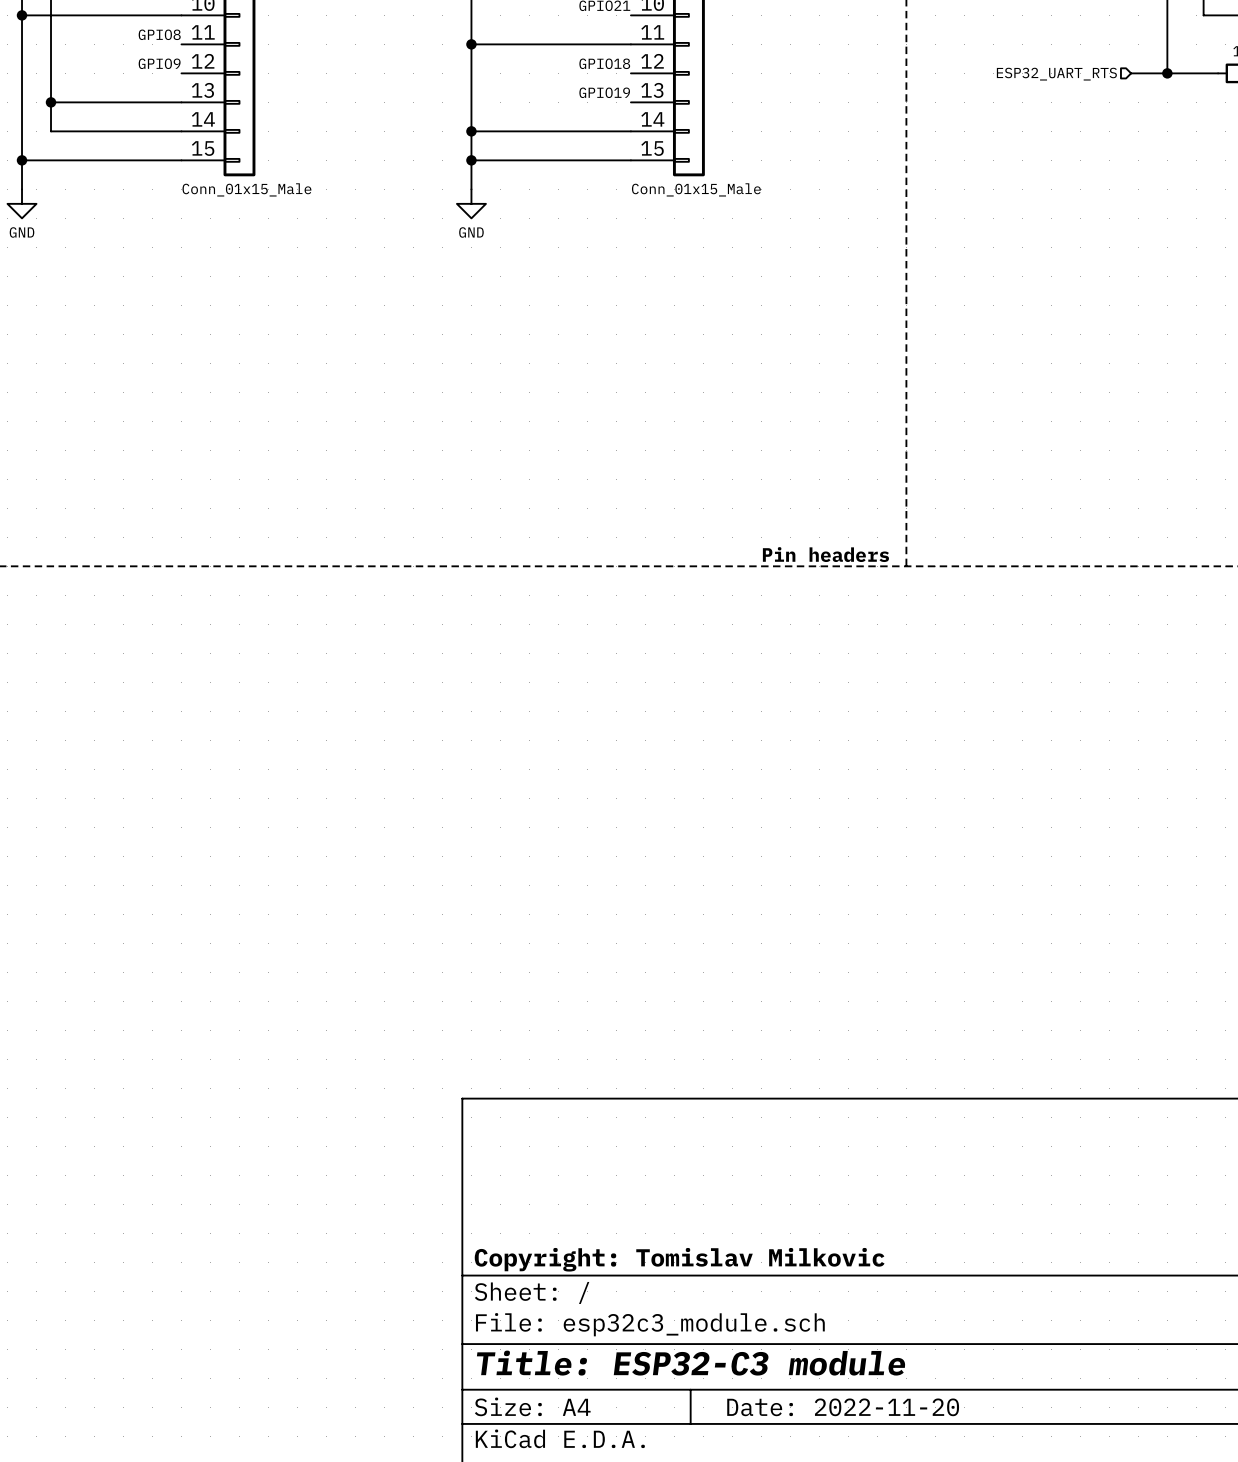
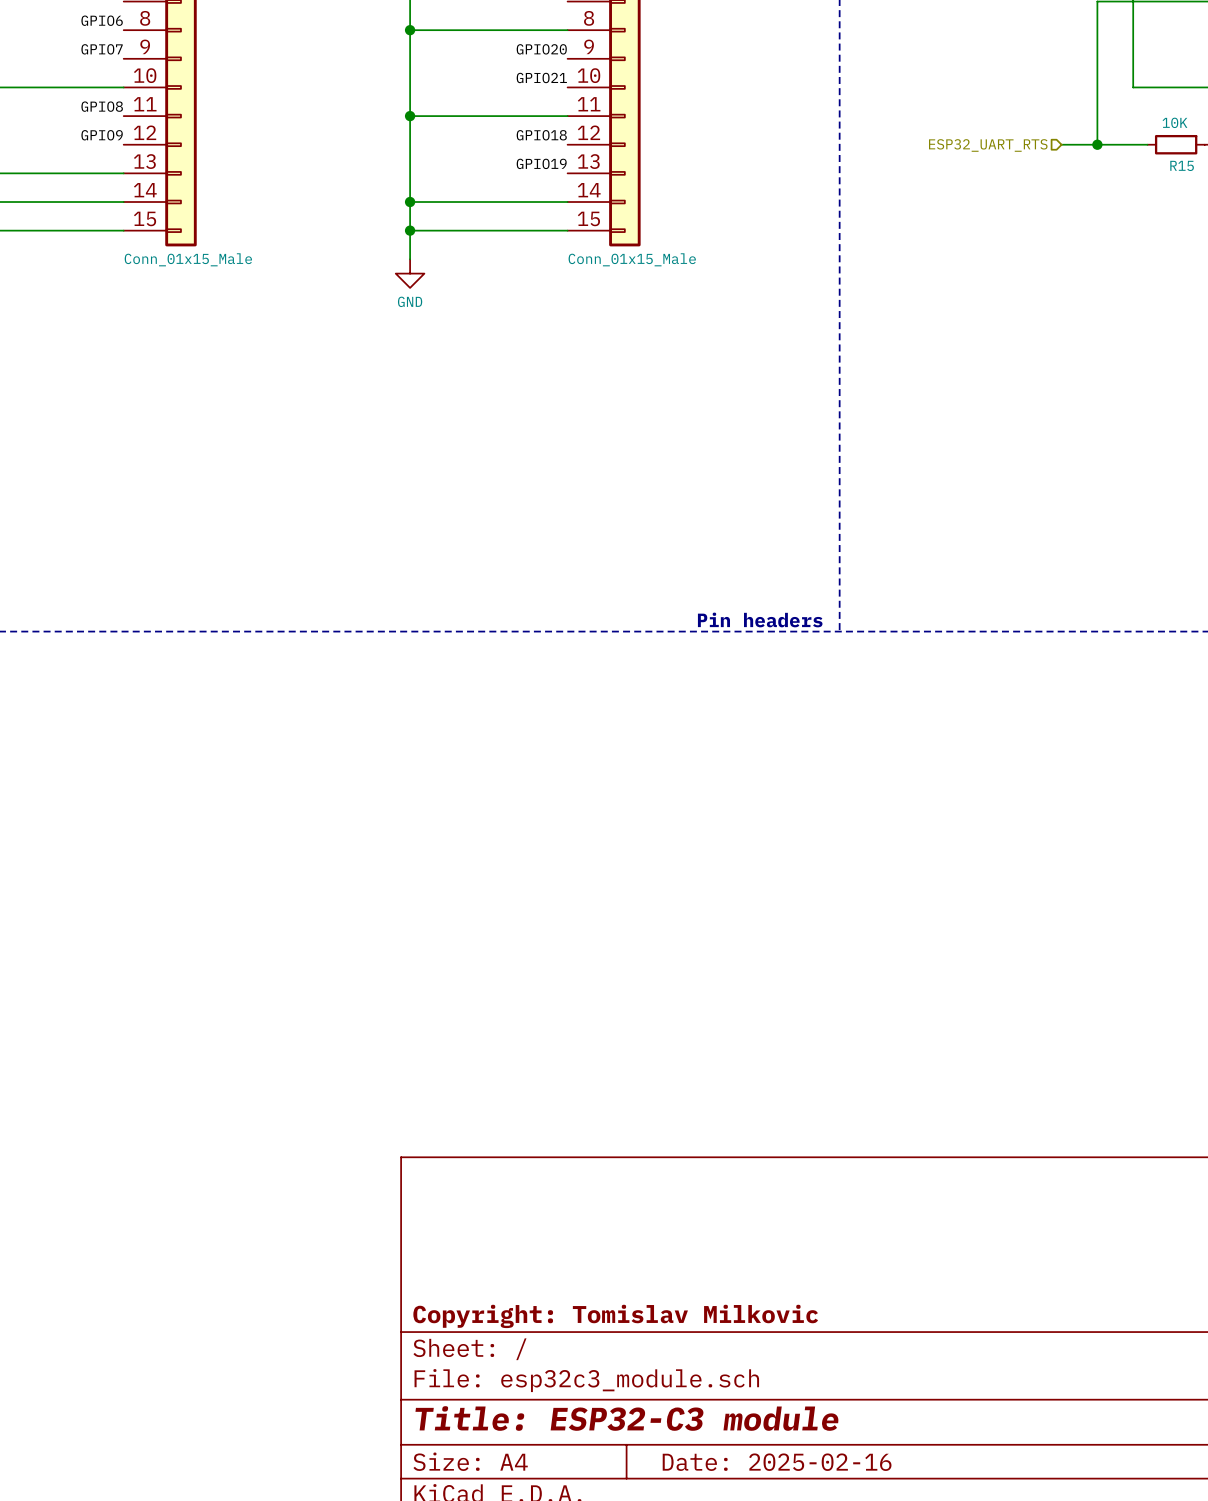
title block: Date: 2022-11-20 (843, 1407) -> Date: 2025-02-16 (777, 1462)

